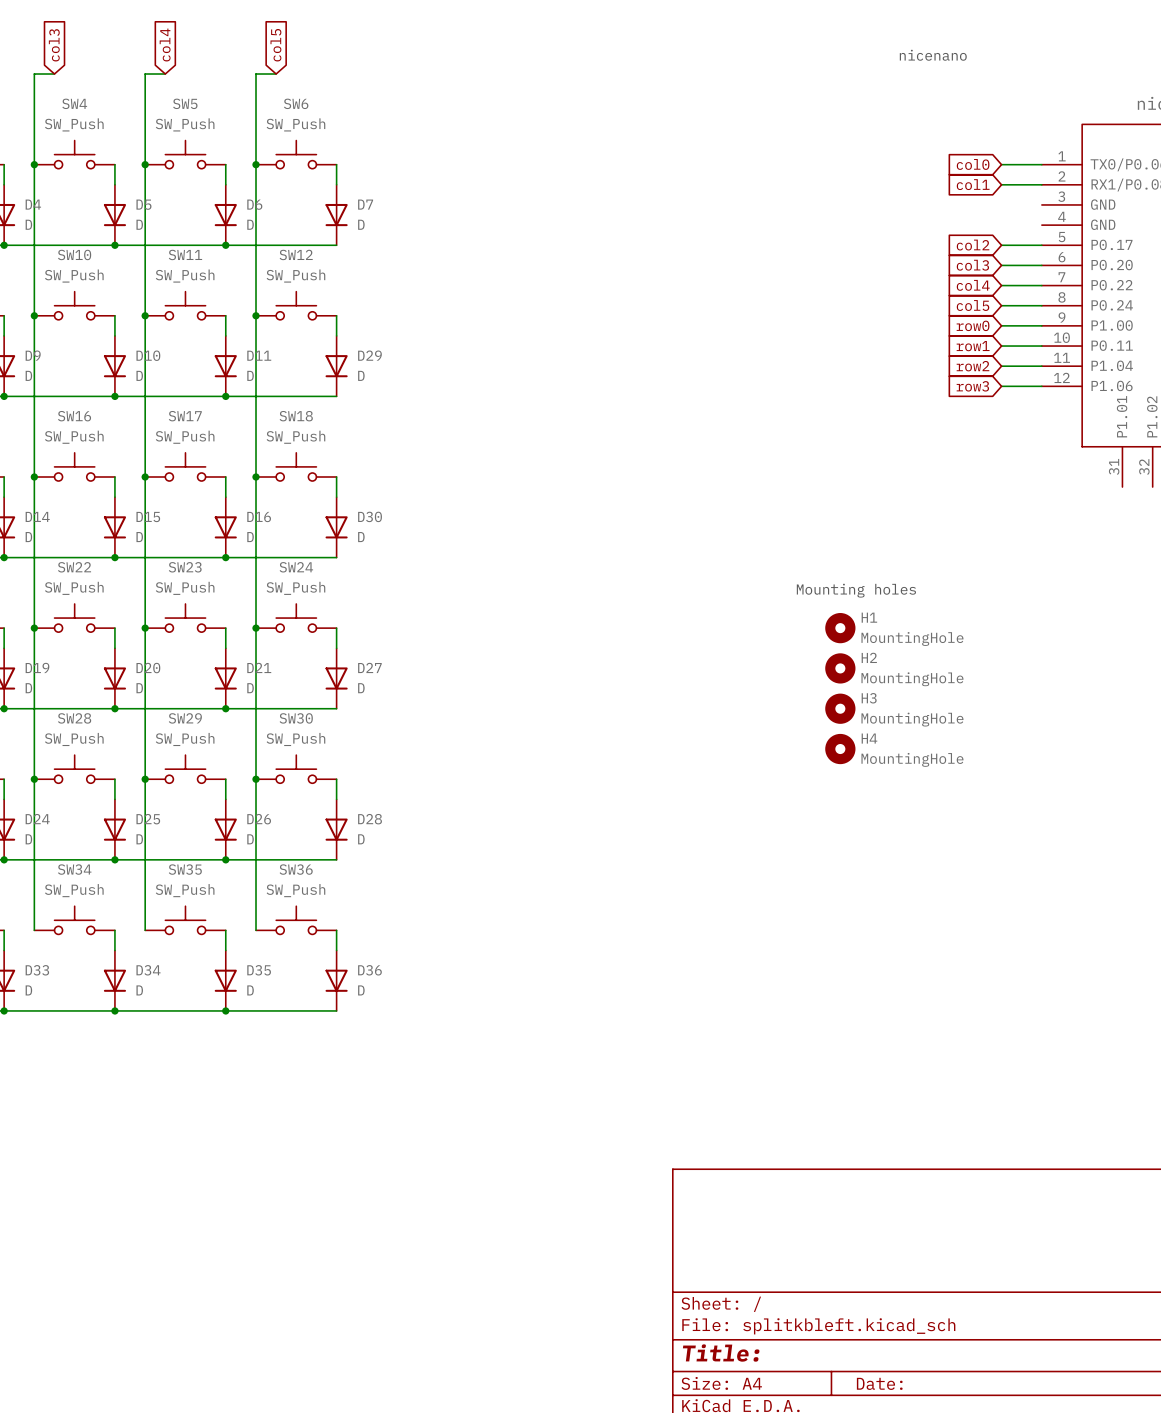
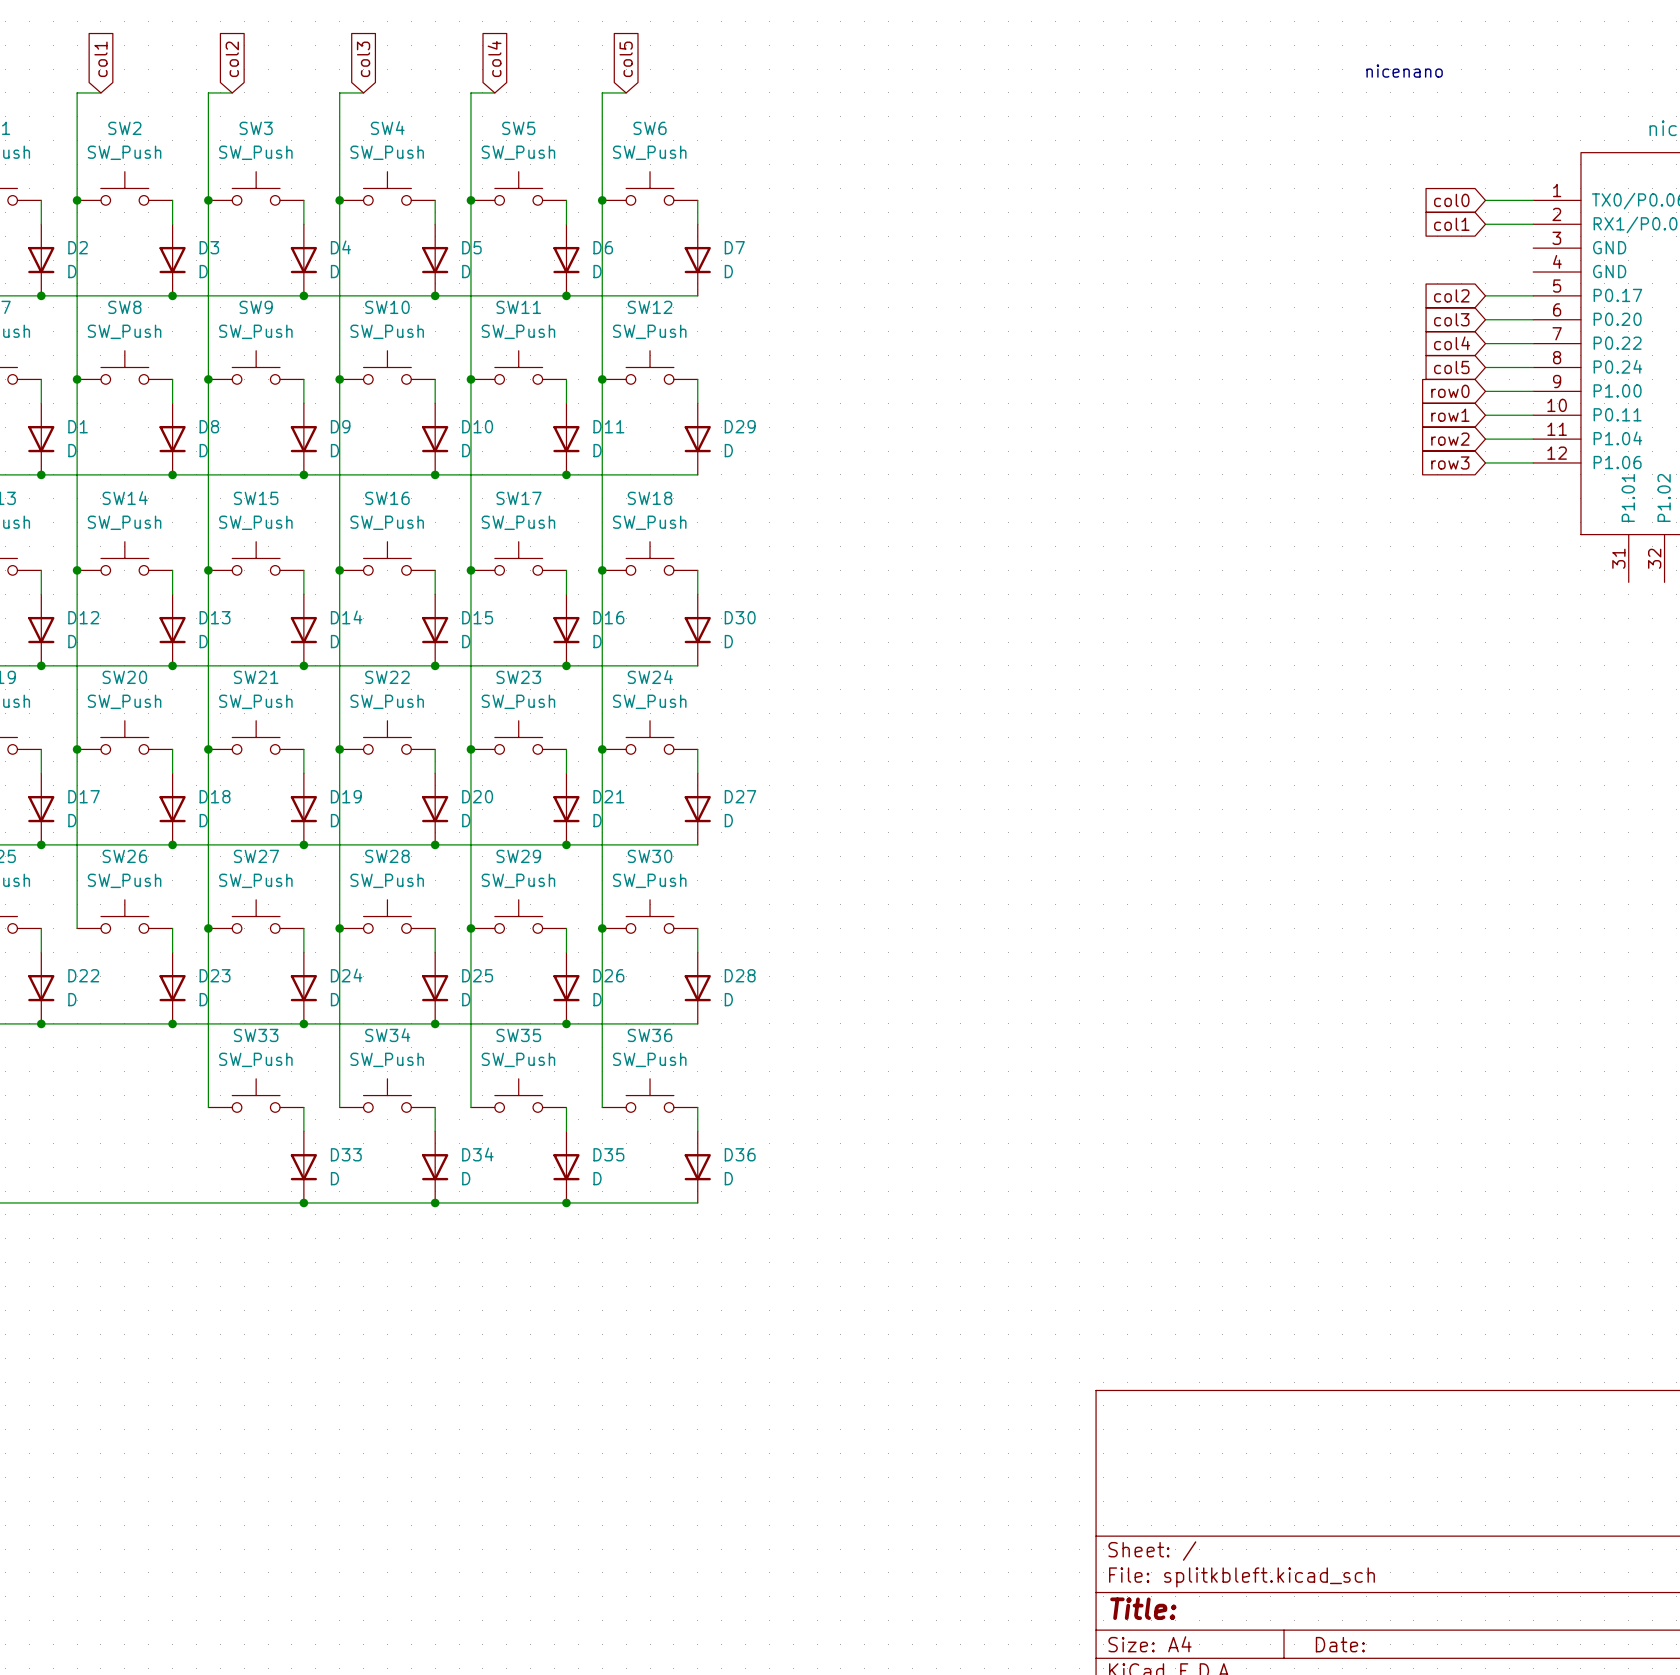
text: Mounting holes (856, 590) -> none
H1: MountingHole (840, 628) -> none
H2: MountingHole (840, 668) -> none
H3: MountingHole (840, 708) -> none
H4: MountingHole (840, 749) -> none

